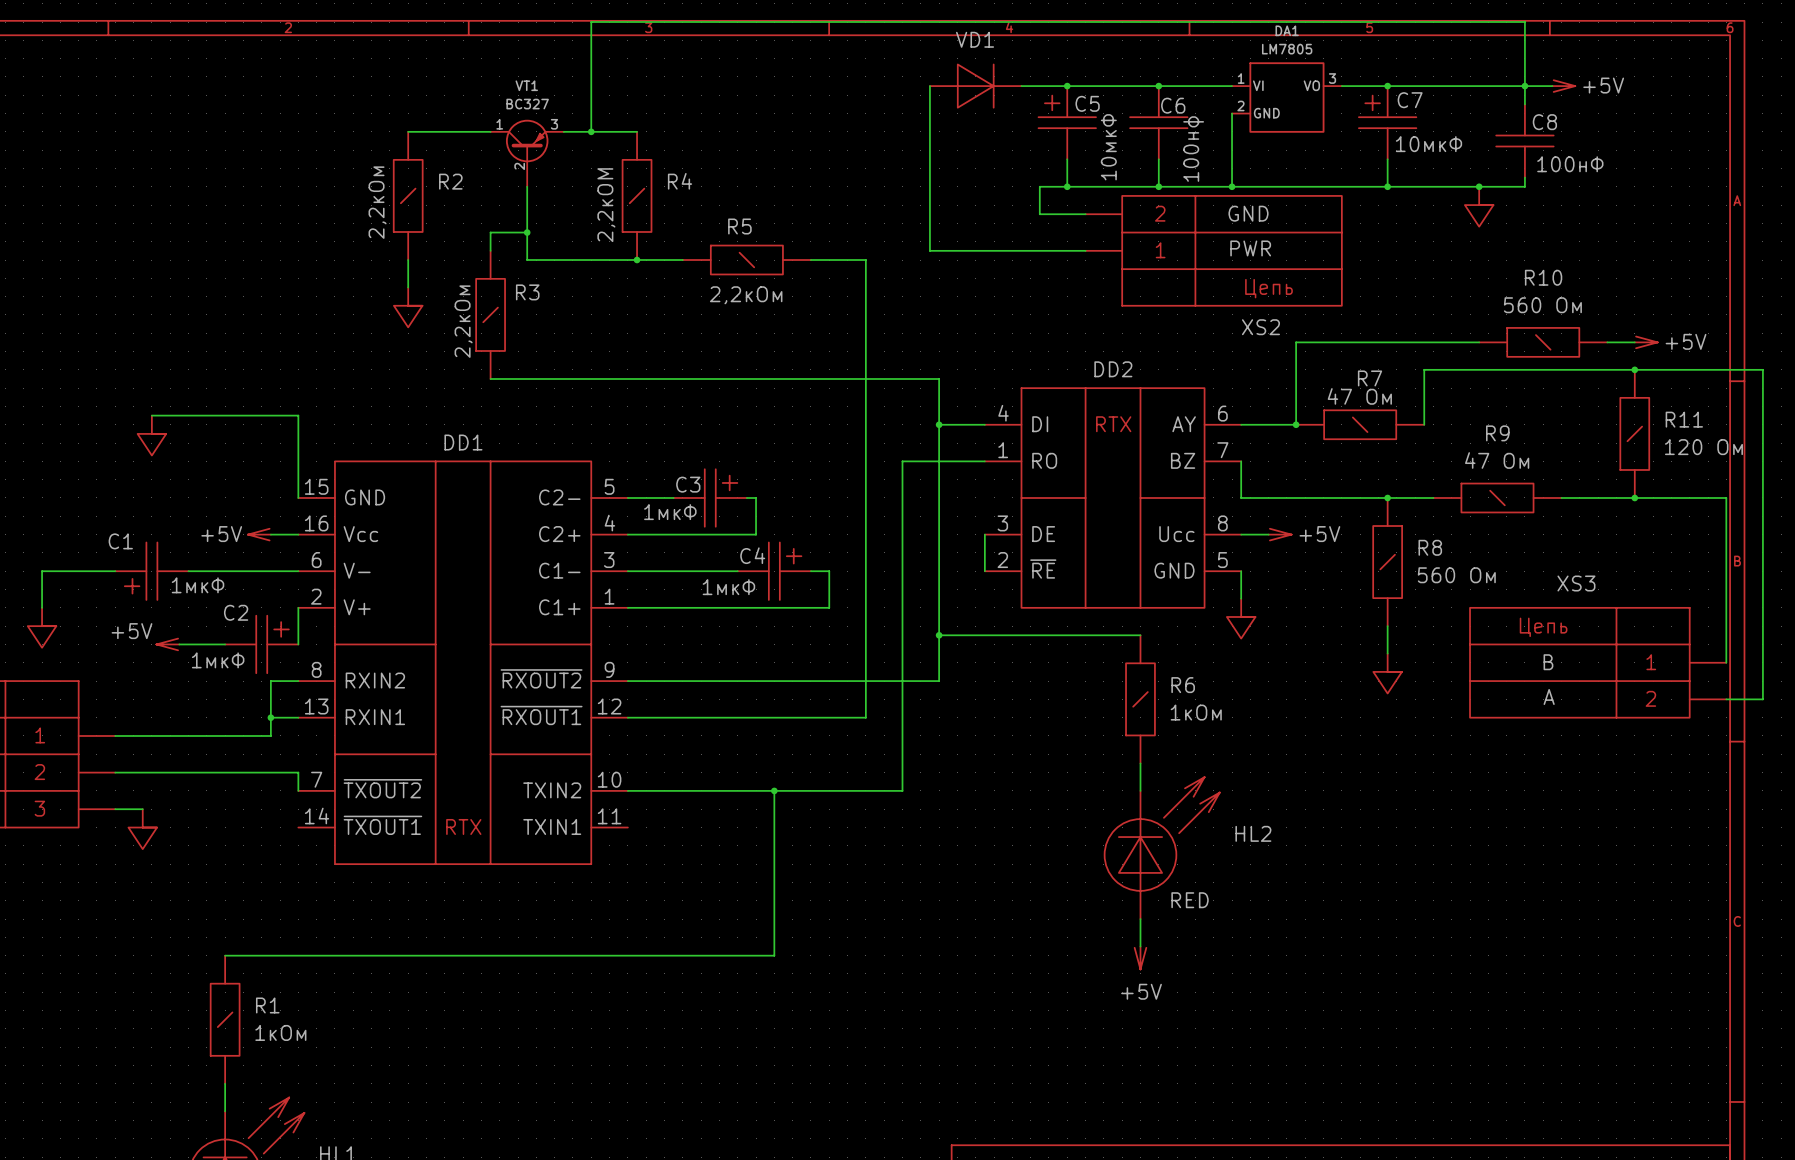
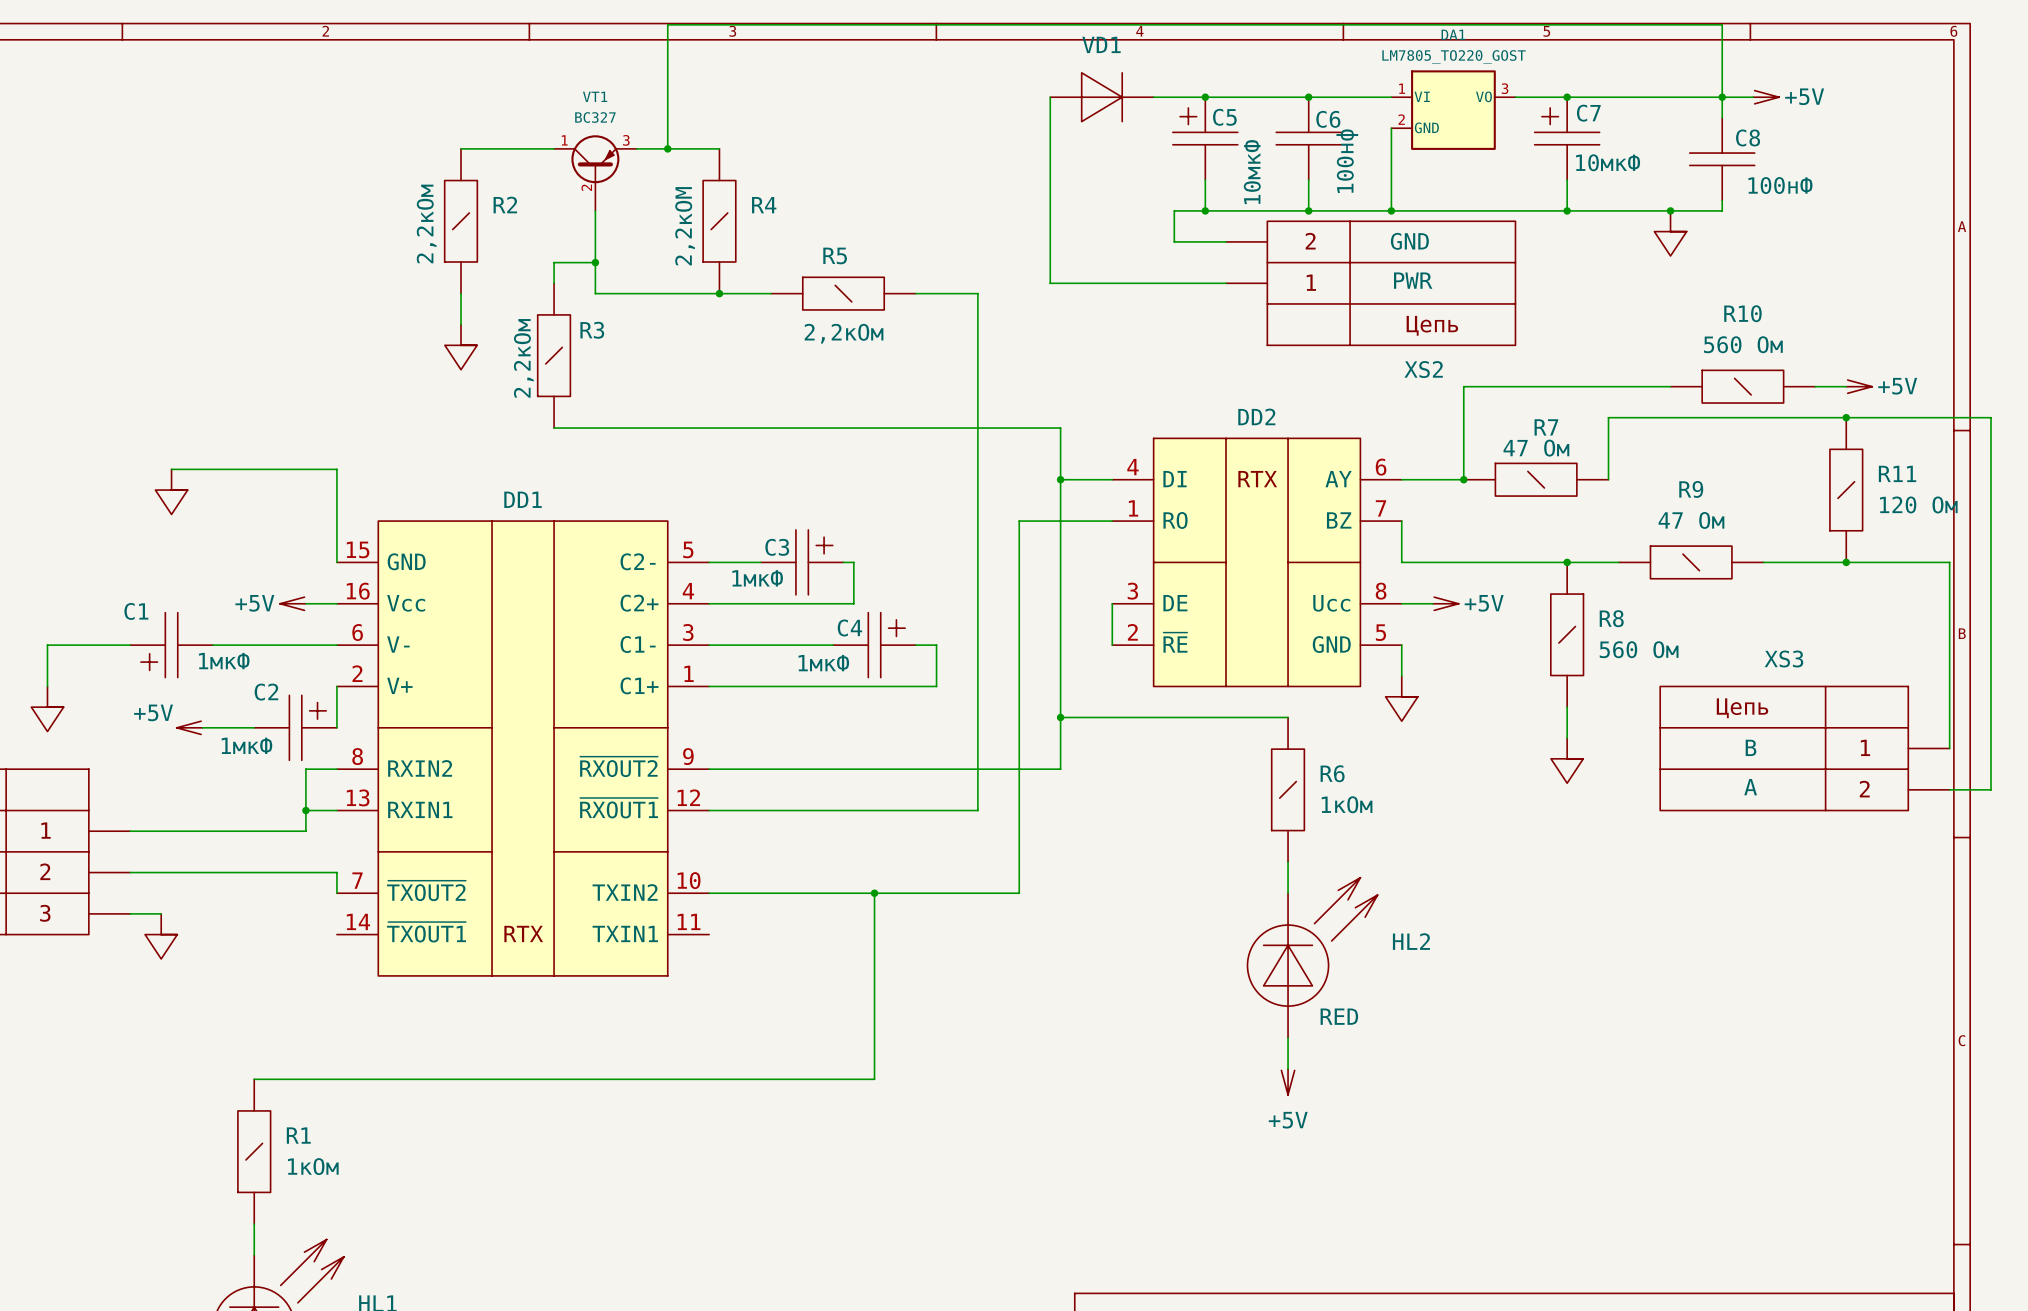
DA1 value: LM7805 (1287, 49) -> LM7805_TO220_GOST (1454, 57)

